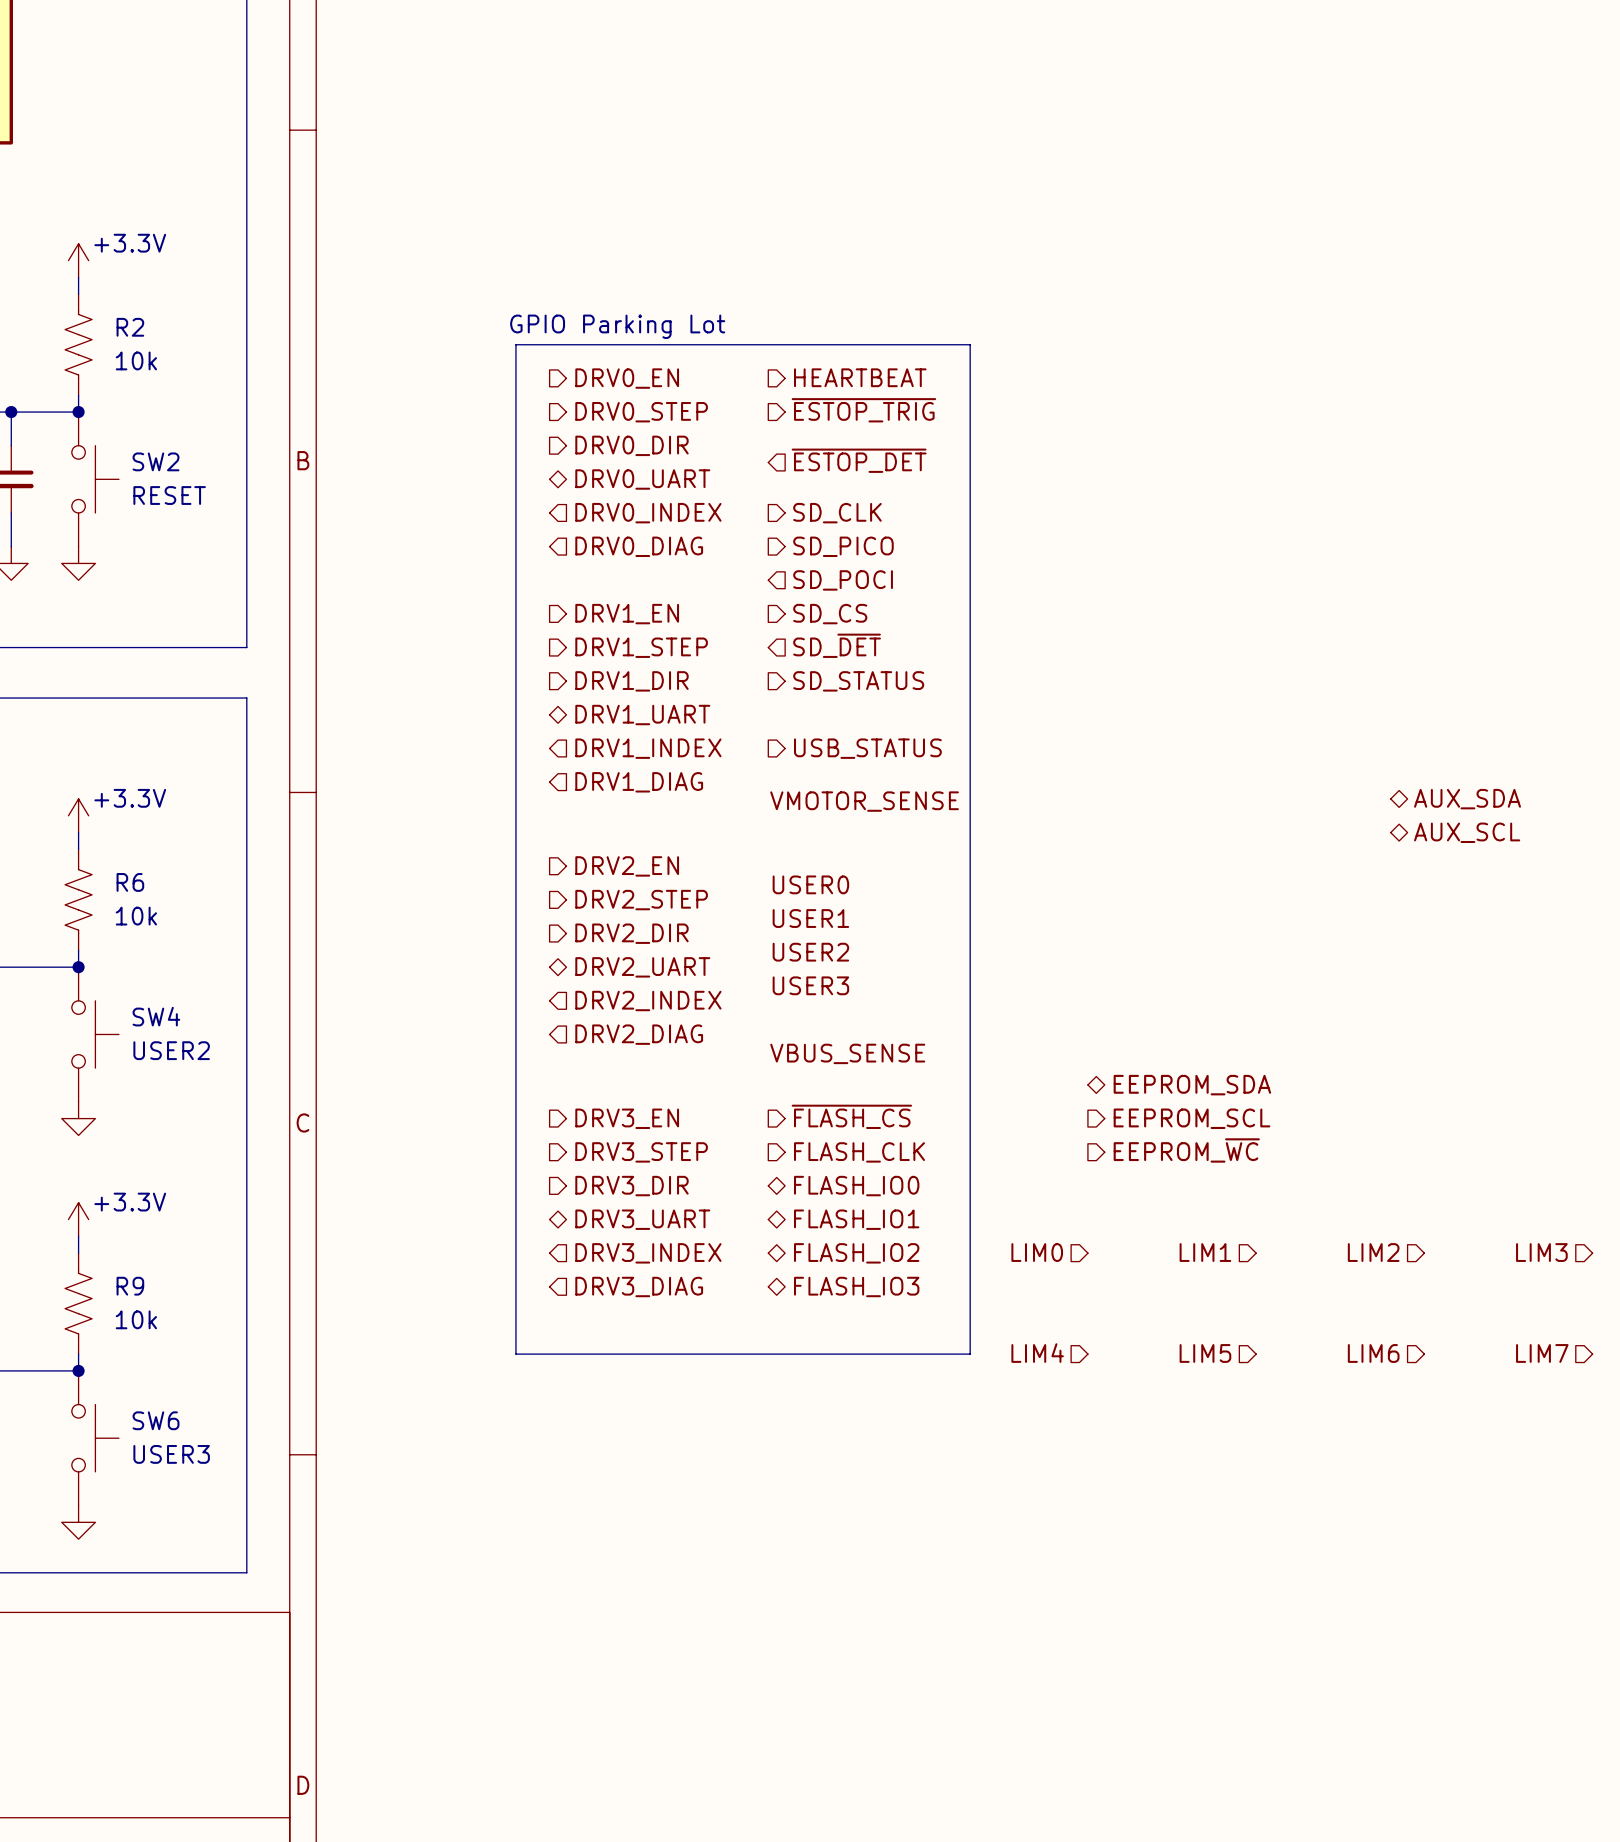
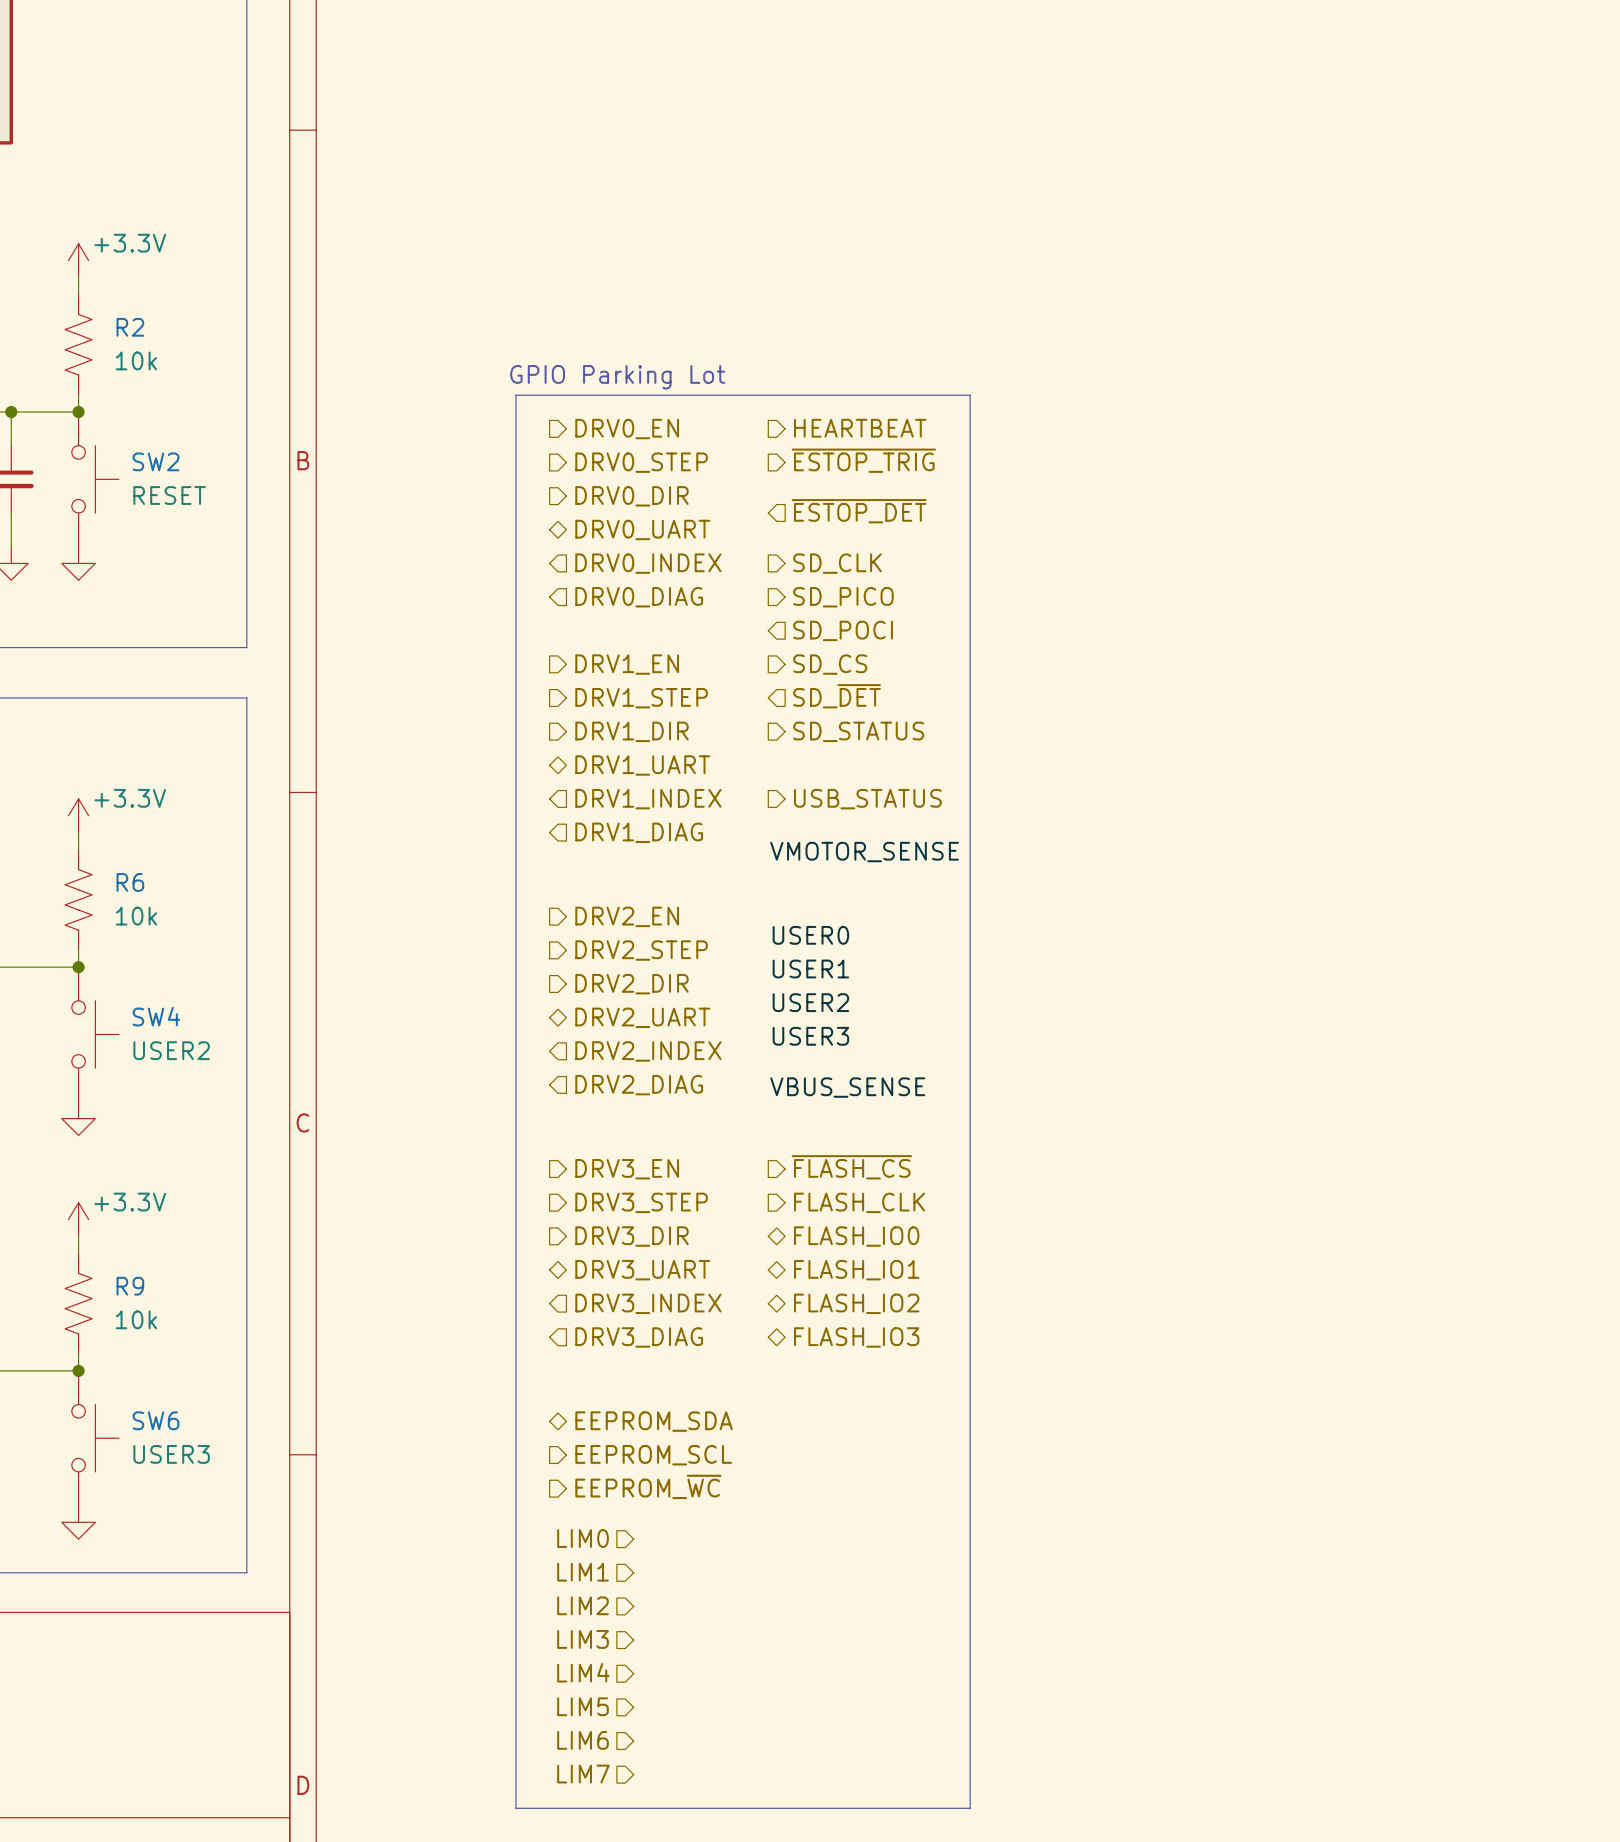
text position: GPIO Parking Lot (617, 326) -> GPIO Parking Lot (617, 377)
hierarchical label position: HEARTBEAT (860, 377) -> HEARTBEAT (860, 428)
hierarchical label position: DRV0_EN (627, 378) -> DRV0_EN (627, 429)
line: (515, 395) (515, 344) (970, 344) (970, 395) -> (515, 395) (970, 395)
hierarchical label: ~{ESTOP_TRIG} (863, 410) -> none
hierarchical label position: DRV0_STEP (641, 412) -> DRV0_STEP (641, 462)
hierarchical label position: DRV0_DIR (631, 445) -> DRV0_DIR (631, 496)
hierarchical label shape: input (859, 460) -> output (863, 460)
hierarchical label: ~{ESTOP_DET} (859, 460) -> ~{ESTOP_TRIG} (863, 460)
hierarchical label position: DRV0_UART (642, 479) -> DRV0_UART (642, 529)
hierarchical label position: DRV0_INDEX (648, 513) -> DRV0_INDEX (648, 563)
hierarchical label shape: output (837, 513) -> input (859, 511)
hierarchical label: SD_CLK (837, 513) -> ~{ESTOP_DET} (859, 511)
hierarchical label position: DRV0_DIAG (639, 546) -> DRV0_DIAG (639, 597)
hierarchical label position: SD_PICO (843, 546) -> SD_PICO (843, 597)
hierarchical label: none -> SD_CLK (837, 563)
hierarchical label position: SD_POCI (843, 580) -> SD_POCI (843, 630)
hierarchical label position: DRV1_EN (627, 614) -> DRV1_EN (627, 664)
hierarchical label position: SD_CS (830, 614) -> SD_CS (830, 664)
hierarchical label position: SD_~{DET} (837, 645) -> SD_~{DET} (837, 696)
hierarchical label position: DRV1_STEP (641, 647) -> DRV1_STEP (641, 698)
hierarchical label position: DRV1_DIR (631, 681) -> DRV1_DIR (631, 731)
hierarchical label position: SD_STATUS (858, 681) -> SD_STATUS (858, 731)
hierarchical label position: DRV1_UART (642, 715) -> DRV1_UART (642, 765)
hierarchical label position: DRV1_INDEX (648, 748) -> DRV1_INDEX (648, 799)
hierarchical label position: USB_STATUS (867, 748) -> USB_STATUS (867, 799)
hierarchical label position: DRV1_DIAG (639, 782) -> DRV1_DIAG (639, 832)
hierarchical label: AUX_SDA (1467, 799) -> none
label position: VMOTOR_SENSE (864, 801) -> VMOTOR_SENSE (864, 852)
hierarchical label: AUX_SCL (1467, 832) -> none
hierarchical label position: DRV2_EN (627, 866) -> DRV2_EN (627, 916)
label position: USER0 (810, 884) -> USER0 (810, 935)
hierarchical label position: DRV2_STEP (641, 900) -> DRV2_STEP (641, 950)
label position: USER1 (810, 918) -> USER1 (810, 968)
hierarchical label position: DRV2_DIR (631, 933) -> DRV2_DIR (631, 984)
label position: USER2 (810, 952) -> USER2 (810, 1002)
hierarchical label position: DRV2_UART (642, 967) -> DRV2_UART (642, 1017)
label position: USER3 (810, 985) -> USER3 (810, 1036)
hierarchical label position: DRV2_INDEX (648, 1001) -> DRV2_INDEX (648, 1051)
hierarchical label position: DRV2_DIAG (639, 1034) -> DRV2_DIAG (639, 1085)
label position: VBUS_SENSE (847, 1053) -> VBUS_SENSE (847, 1087)
hierarchical label: EEPROM_SDA (1192, 1085) -> none
hierarchical label position: ~{FLASH_CS} (851, 1116) -> ~{FLASH_CS} (851, 1167)
hierarchical label position: DRV3_EN (627, 1118) -> DRV3_EN (627, 1169)
hierarchical label: EEPROM_SCL (1192, 1118) -> none
hierarchical label: EEPROM_~{WC} (1186, 1150) -> none
hierarchical label position: DRV3_STEP (641, 1152) -> DRV3_STEP (641, 1202)
hierarchical label position: FLASH_CLK (859, 1152) -> FLASH_CLK (859, 1202)
hierarchical label position: DRV3_DIR (631, 1186) -> DRV3_DIR (631, 1236)
hierarchical label position: FLASH_IO0 (856, 1186) -> FLASH_IO0 (856, 1236)
hierarchical label position: DRV3_UART (642, 1219) -> DRV3_UART (642, 1270)
hierarchical label position: FLASH_IO1 (856, 1219) -> FLASH_IO1 (856, 1270)
hierarchical label: LIM0 (1037, 1252) -> none
hierarchical label: LIM1 (1205, 1252) -> none
hierarchical label: LIM2 (1373, 1252) -> none
hierarchical label: LIM3 (1541, 1252) -> none
hierarchical label position: DRV3_INDEX (648, 1253) -> DRV3_INDEX (648, 1303)
hierarchical label position: FLASH_IO2 (856, 1253) -> FLASH_IO2 (856, 1303)
hierarchical label position: DRV3_DIAG (639, 1286) -> DRV3_DIAG (639, 1337)
hierarchical label position: FLASH_IO3 (856, 1286) -> FLASH_IO3 (856, 1337)
hierarchical label: LIM4 (1037, 1353) -> none
hierarchical label: LIM5 (1205, 1353) -> none
hierarchical label: LIM6 (1373, 1353) -> none
hierarchical label: LIM7 (1542, 1353) -> none
line: (515, 1354) (970, 1354) -> (515, 1354) (515, 1808) (970, 1808) (970, 1354)
hierarchical label: none -> EEPROM_SDA (654, 1421)
hierarchical label: none -> EEPROM_SCL (653, 1455)
hierarchical label: none -> EEPROM_~{WC} (648, 1486)
hierarchical label: none -> LIM0 (582, 1538)
hierarchical label: none -> LIM1 (582, 1572)
hierarchical label: none -> LIM2 (582, 1605)
hierarchical label: none -> LIM3 (582, 1639)
hierarchical label: none -> LIM4 (583, 1672)
hierarchical label: none -> LIM5 (582, 1706)
hierarchical label: none -> LIM6 (582, 1740)
hierarchical label: none -> LIM7 (583, 1774)

